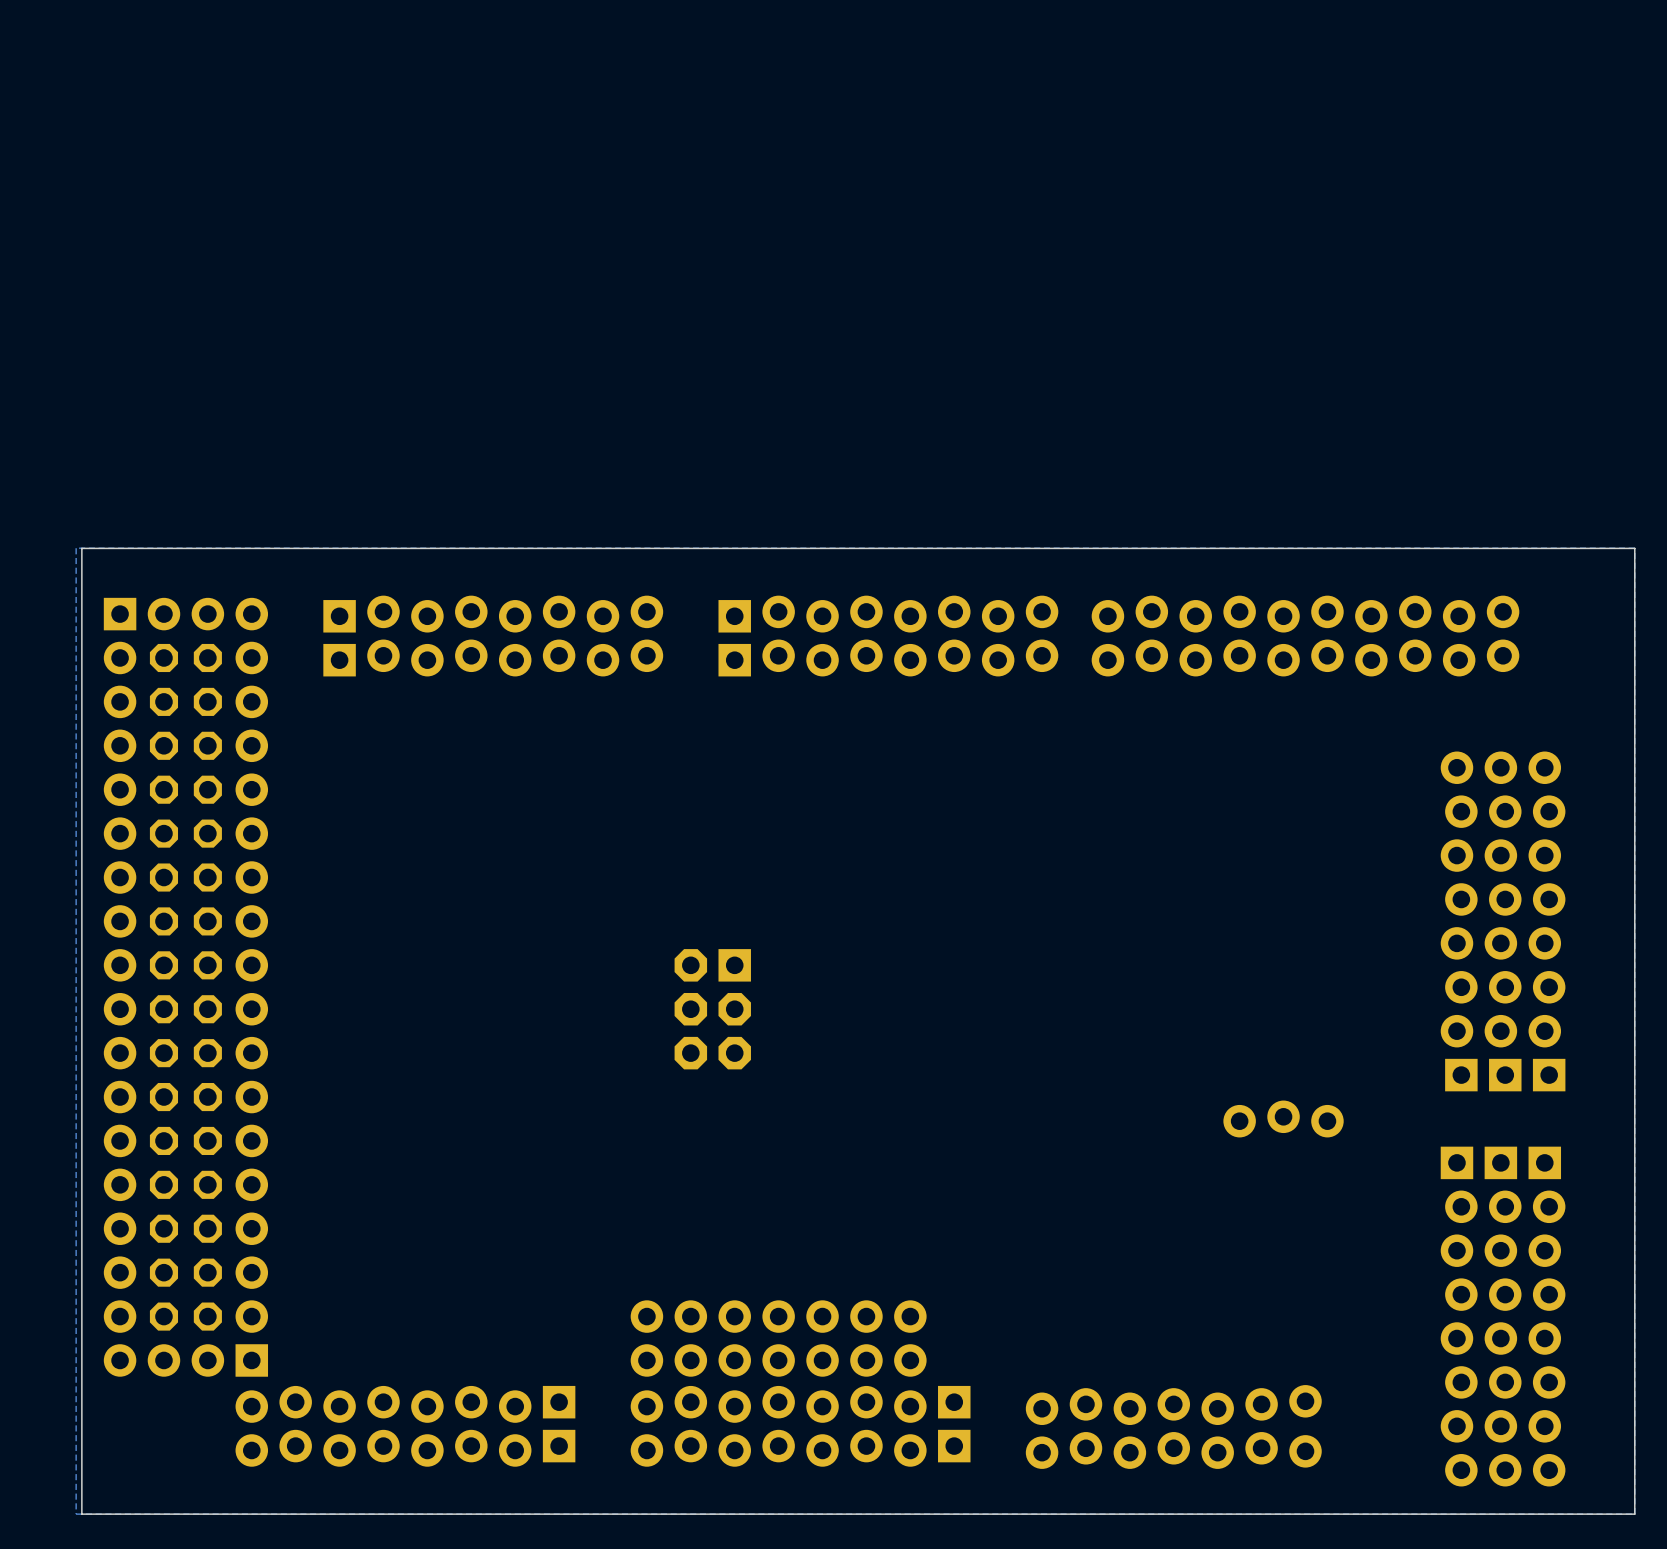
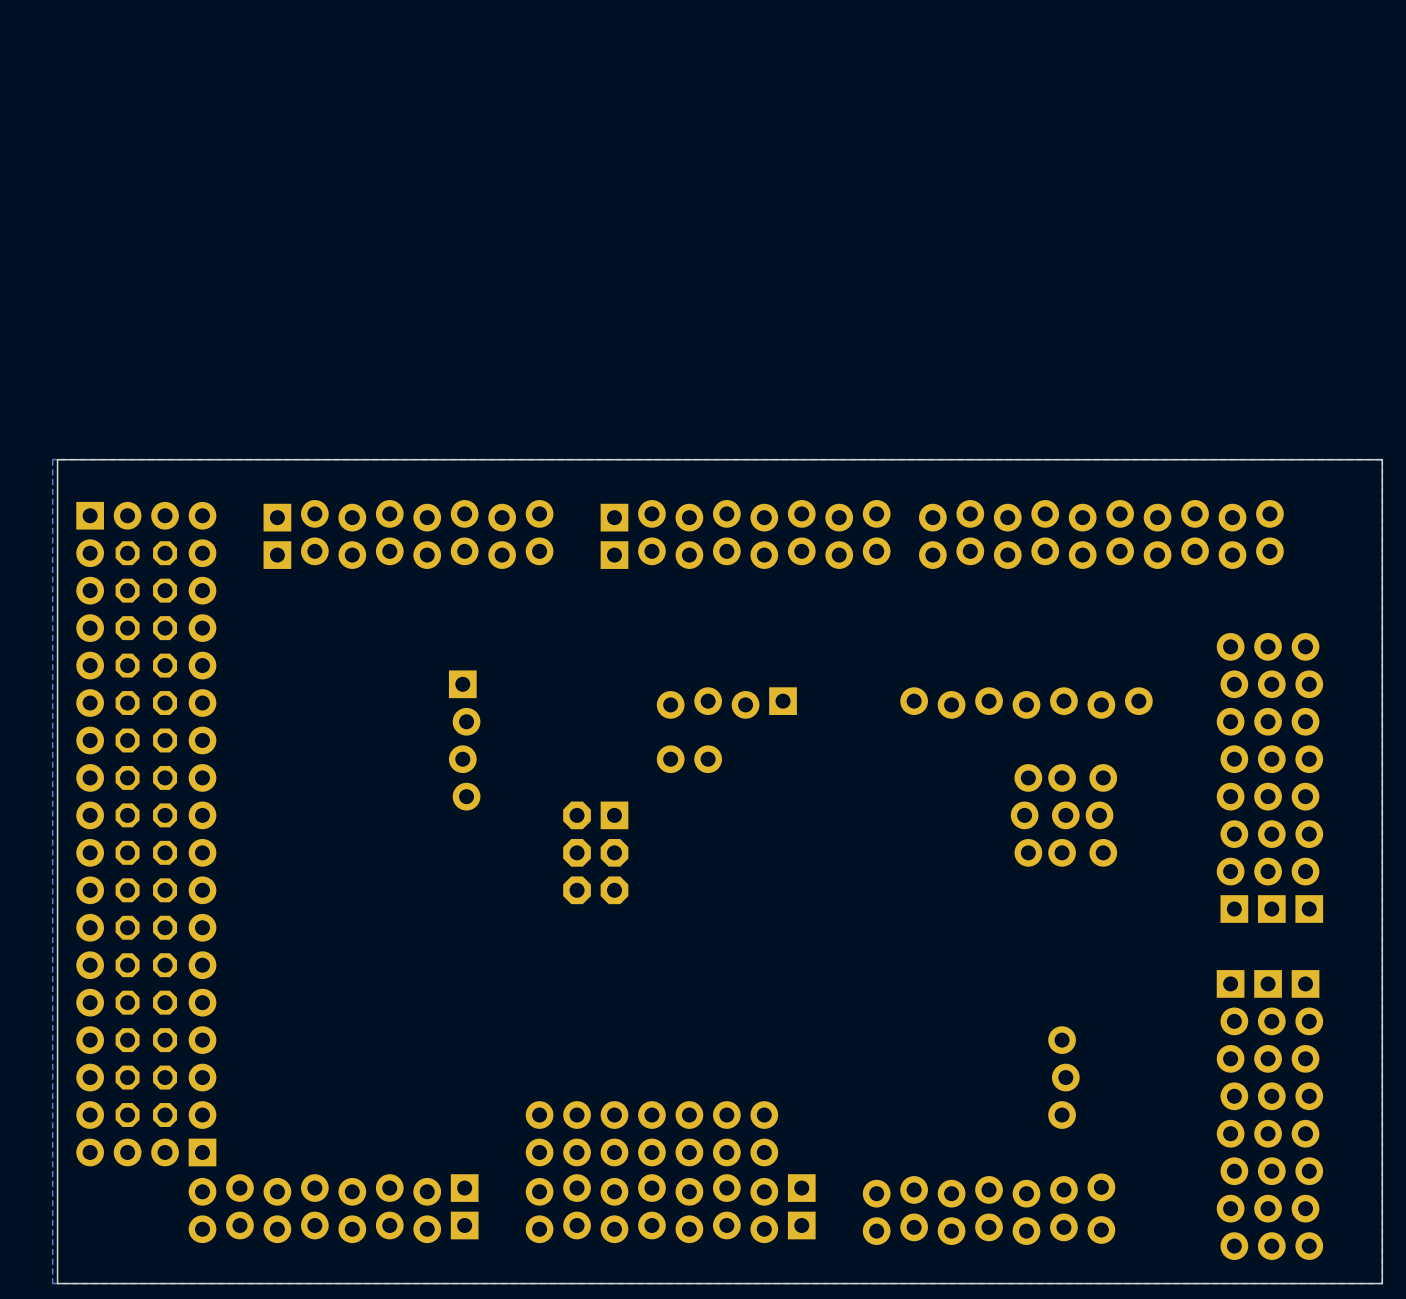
part: none -> (726, 703)
part: none -> (1026, 703)
part: none -> (464, 740)
part: none -> (689, 759)
part: none -> (1026, 815)
part: none -> (1063, 815)
part: none -> (1101, 815)
part: (1283, 1118) -> none
part: none -> (1063, 1077)

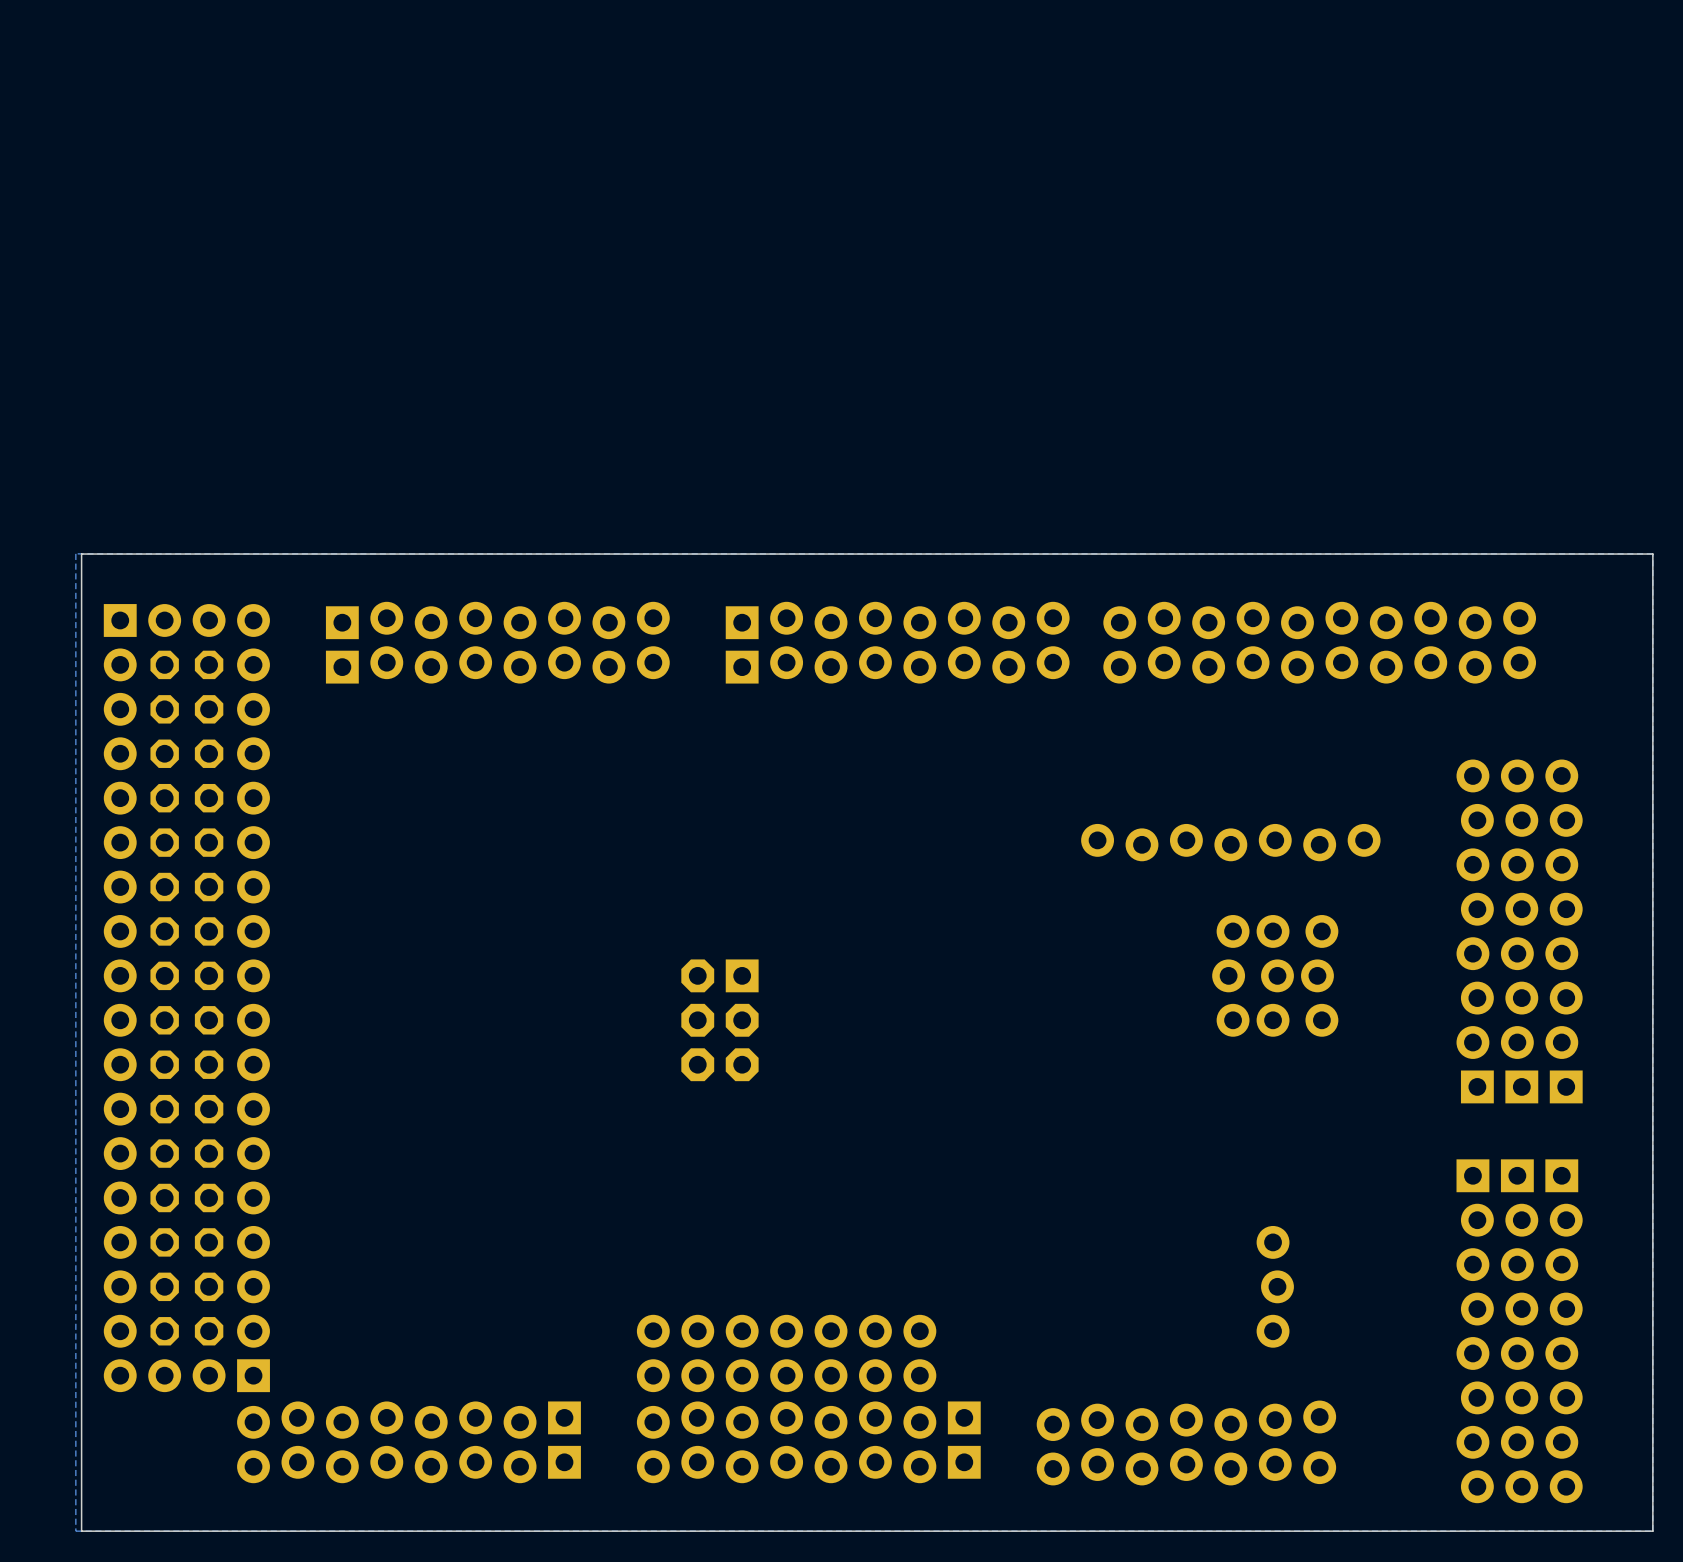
part: (726, 703) -> none
part: (464, 740) -> none
part: (689, 759) -> none

